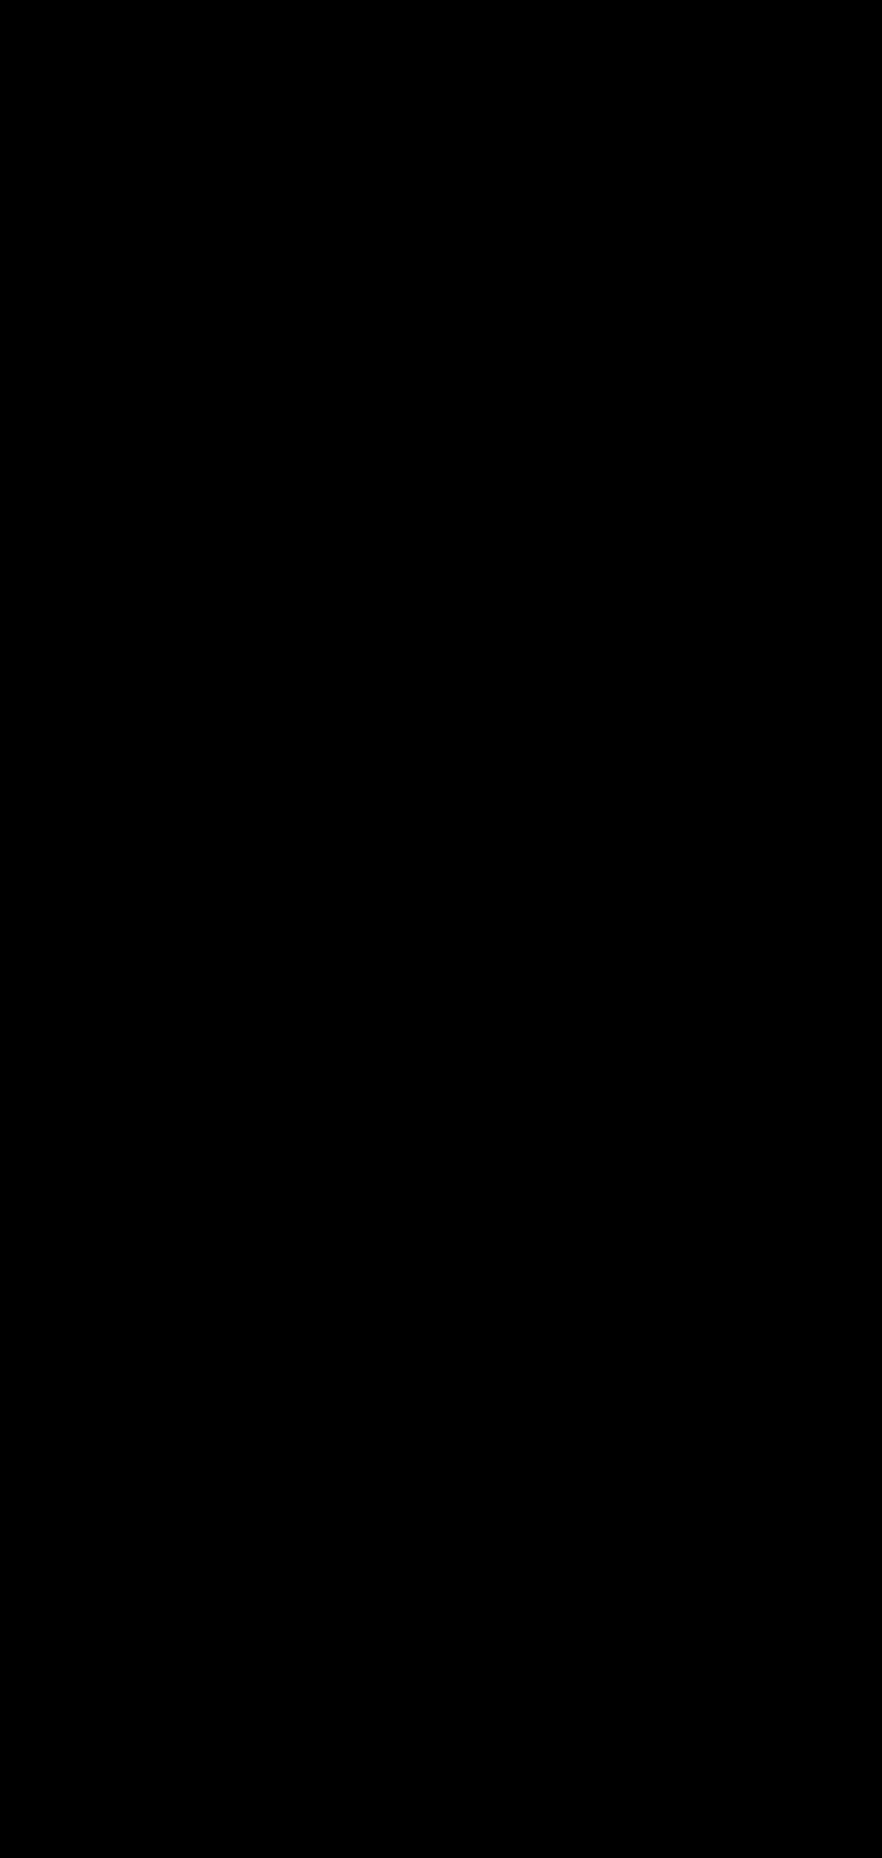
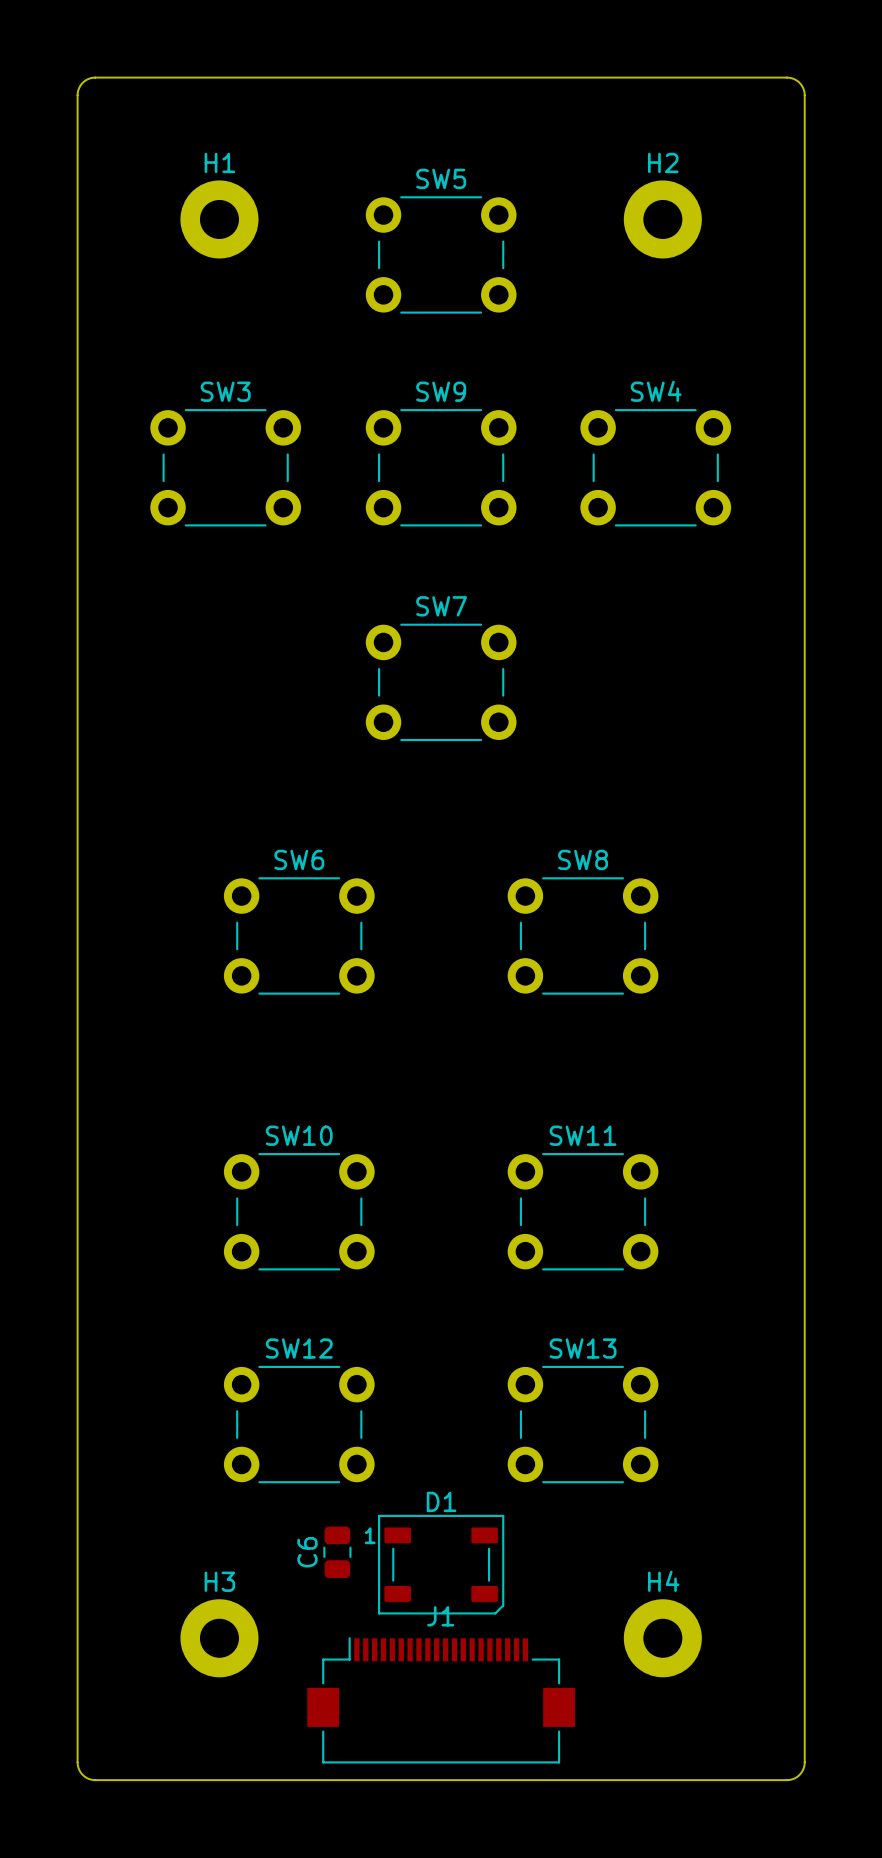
board edge: none -> (95, 77) (786, 77) (796, 80) (803, 89) (804, 1762) (802, 1771) (792, 1779) (95, 1780) (85, 1777) (78, 1768) (77, 95) (82, 82) (95, 77)
H1: none -> (219, 219)
H2: none -> (662, 219)
SW5: none -> (441, 254)
SW3: none -> (225, 467)
SW9: none -> (441, 467)
SW4: none -> (655, 467)
SW7: none -> (441, 682)
SW6: none -> (299, 935)
SW8: none -> (583, 935)
SW10: none -> (299, 1211)
SW11: none -> (583, 1211)
SW12: none -> (299, 1424)
SW13: none -> (583, 1424)
C6: none -> (337, 1552)
D1: none -> (441, 1564)
H3: none -> (219, 1638)
H4: none -> (662, 1638)
J1: none -> (441, 1700)

